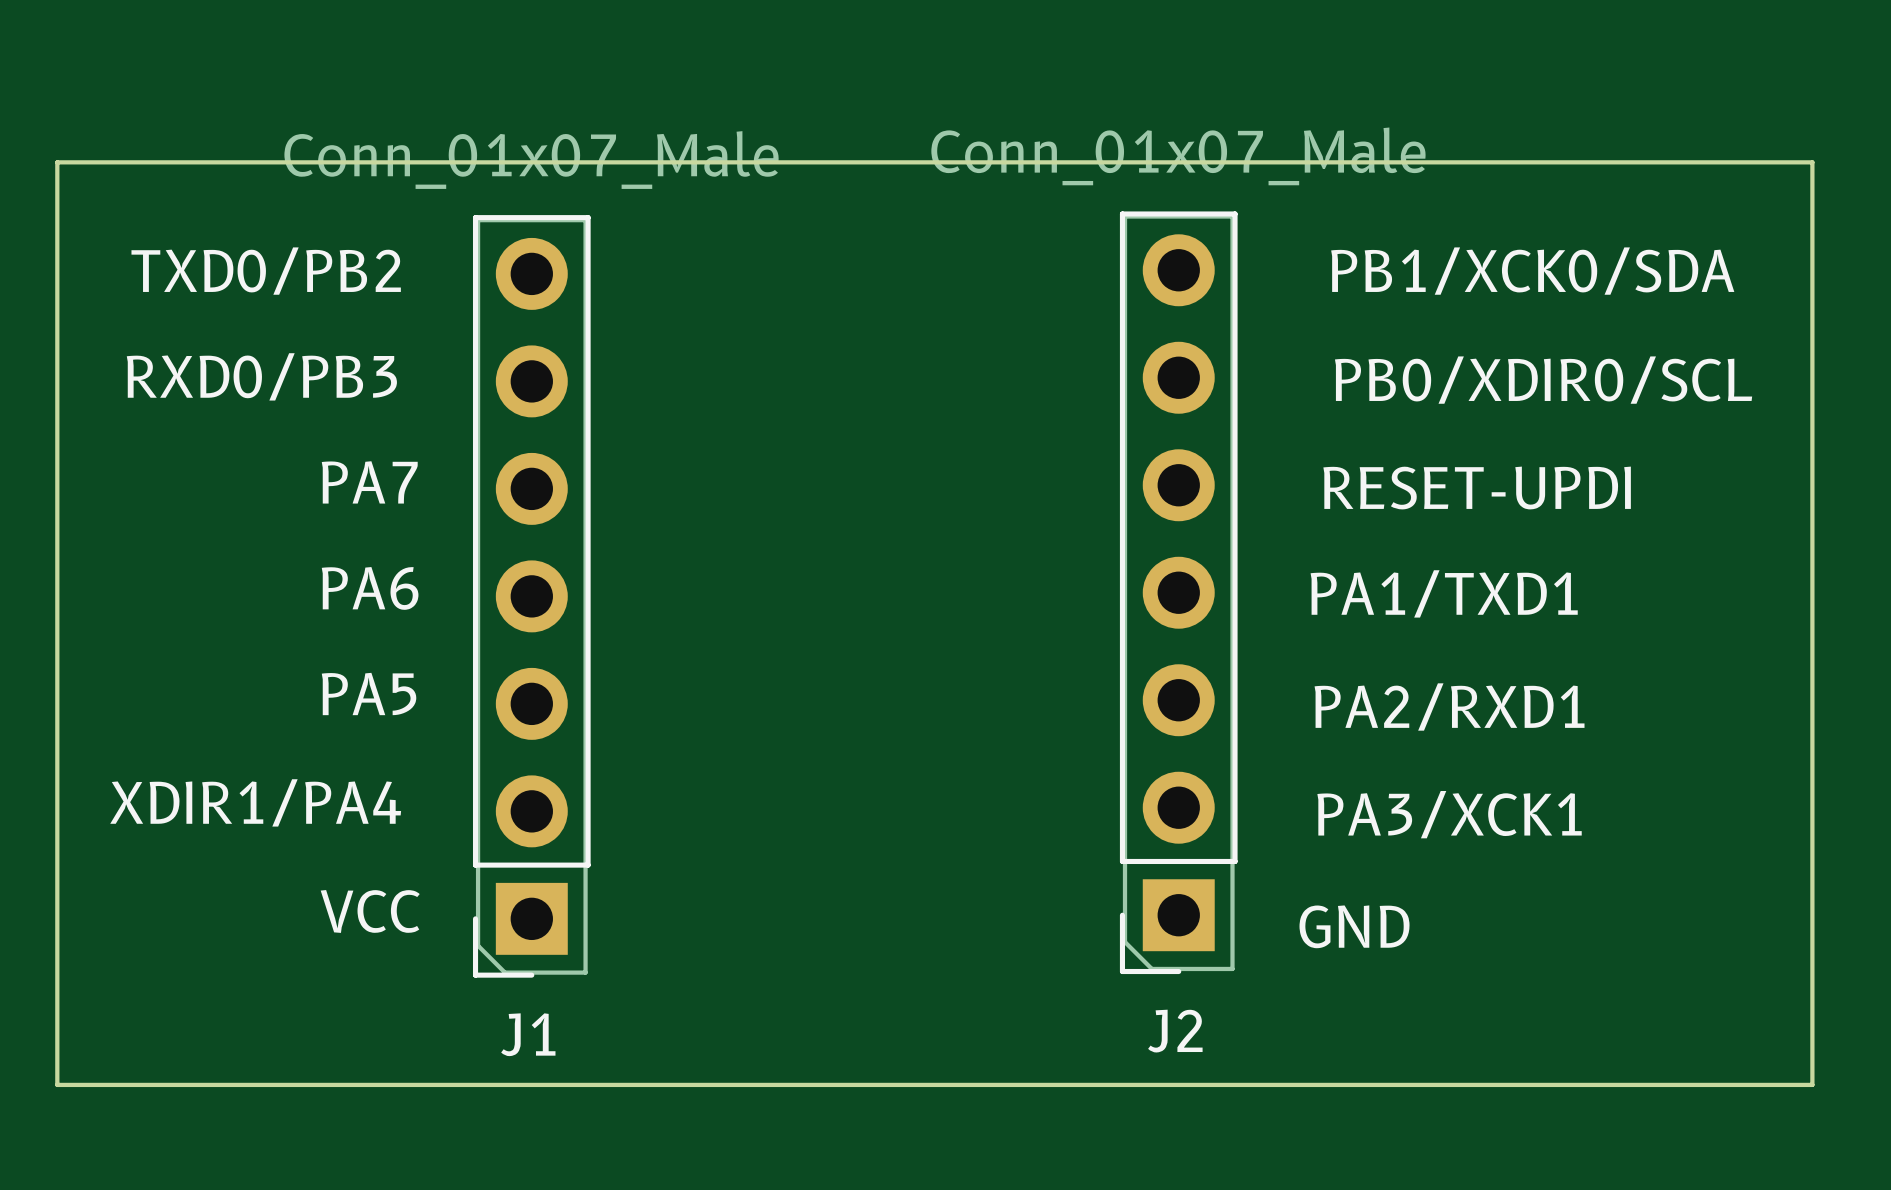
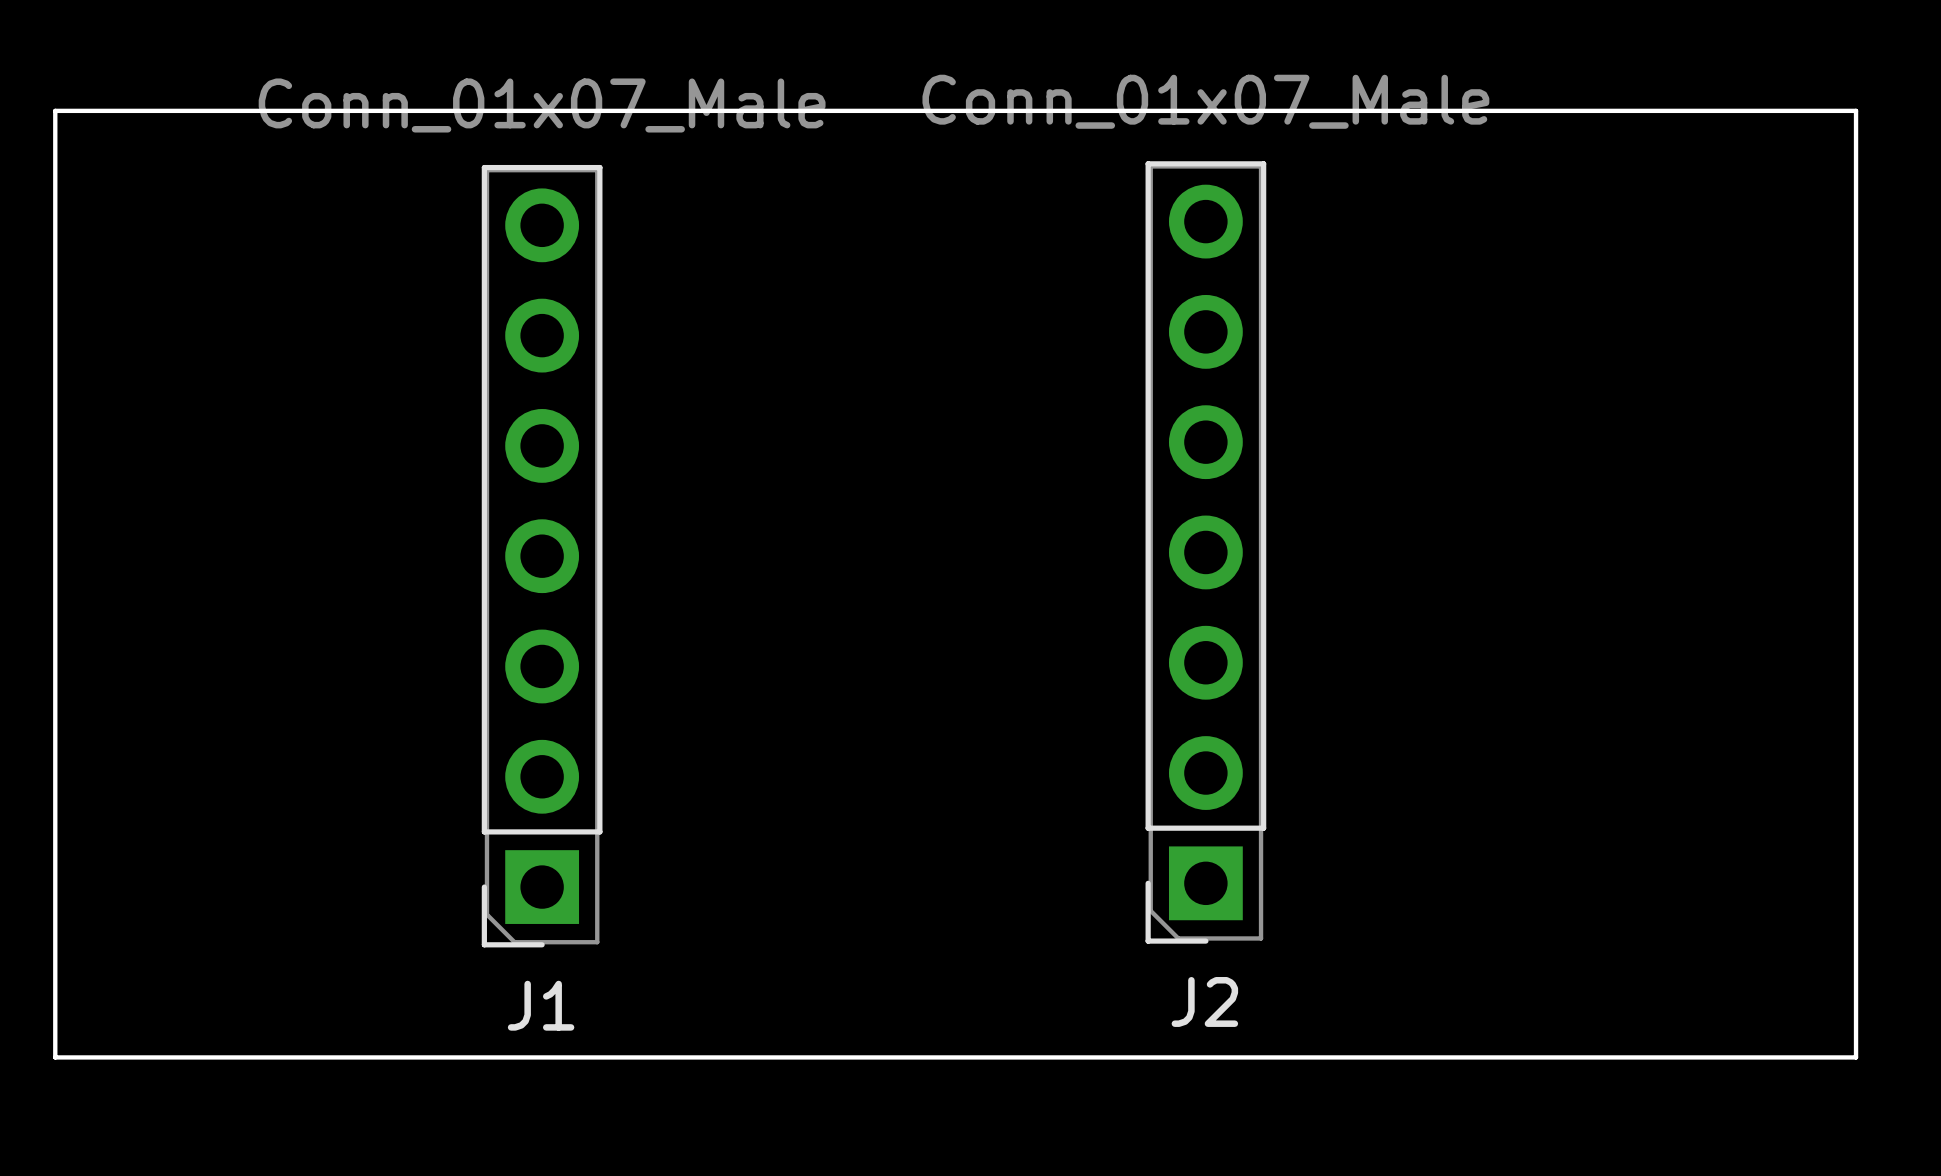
text: TXD0/PB2 (266, 271) -> none
text: PB1/XCK0/SDA (1532, 271) -> none
text: RXD0/PB3 (261, 376) -> none
text: PB0/XDIR0/SCL (1543, 380) -> none
text: PA7 (369, 482) -> none
text: RESET-UPDI (1477, 488) -> none
text: PA6 (370, 588) -> none
text: PA1/TXD1 (1444, 593) -> none
text: PA5 (369, 694) -> none
text: PA2/RXD1 (1449, 707) -> none
text: XDIR1/PA4 (255, 802) -> none
text: PA3/XCK1 (1449, 814) -> none
text: VCC (370, 911) -> none
text: GND (1354, 926) -> none

